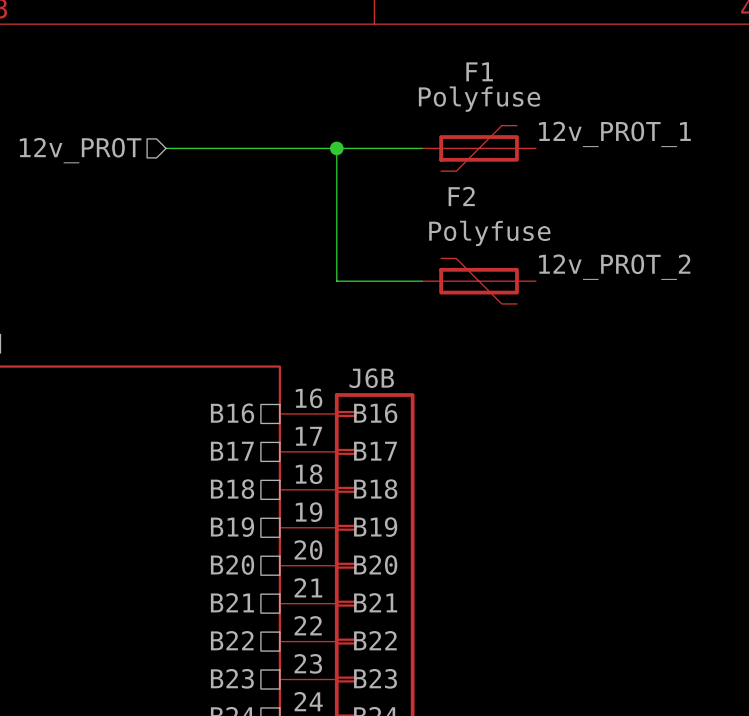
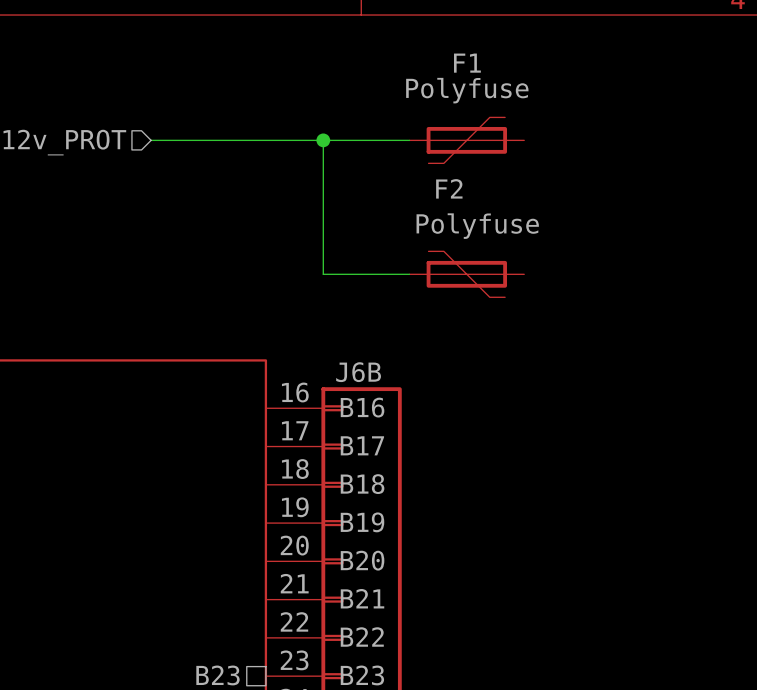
label: 12v_PROT_1 (614, 134) -> none
label: 12v_PROT_2 (614, 267) -> none
sheet pin: B16 (232, 413) -> none
sheet pin: B17 (232, 451) -> none
sheet pin: B18 (232, 489) -> none
sheet pin: B19 (232, 527) -> none
sheet pin: B20 (232, 565) -> none
sheet pin: B21 (232, 602) -> none
sheet pin: B22 (232, 640) -> none

